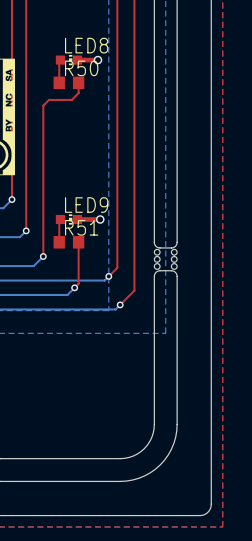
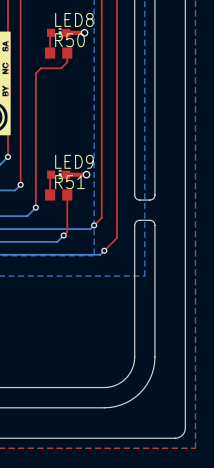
hole: (157, 252) -> none
hole: (174, 252) -> none
hole: (157, 259) -> none
hole: (174, 259) -> none
hole: (157, 266) -> none
hole: (174, 266) -> none

